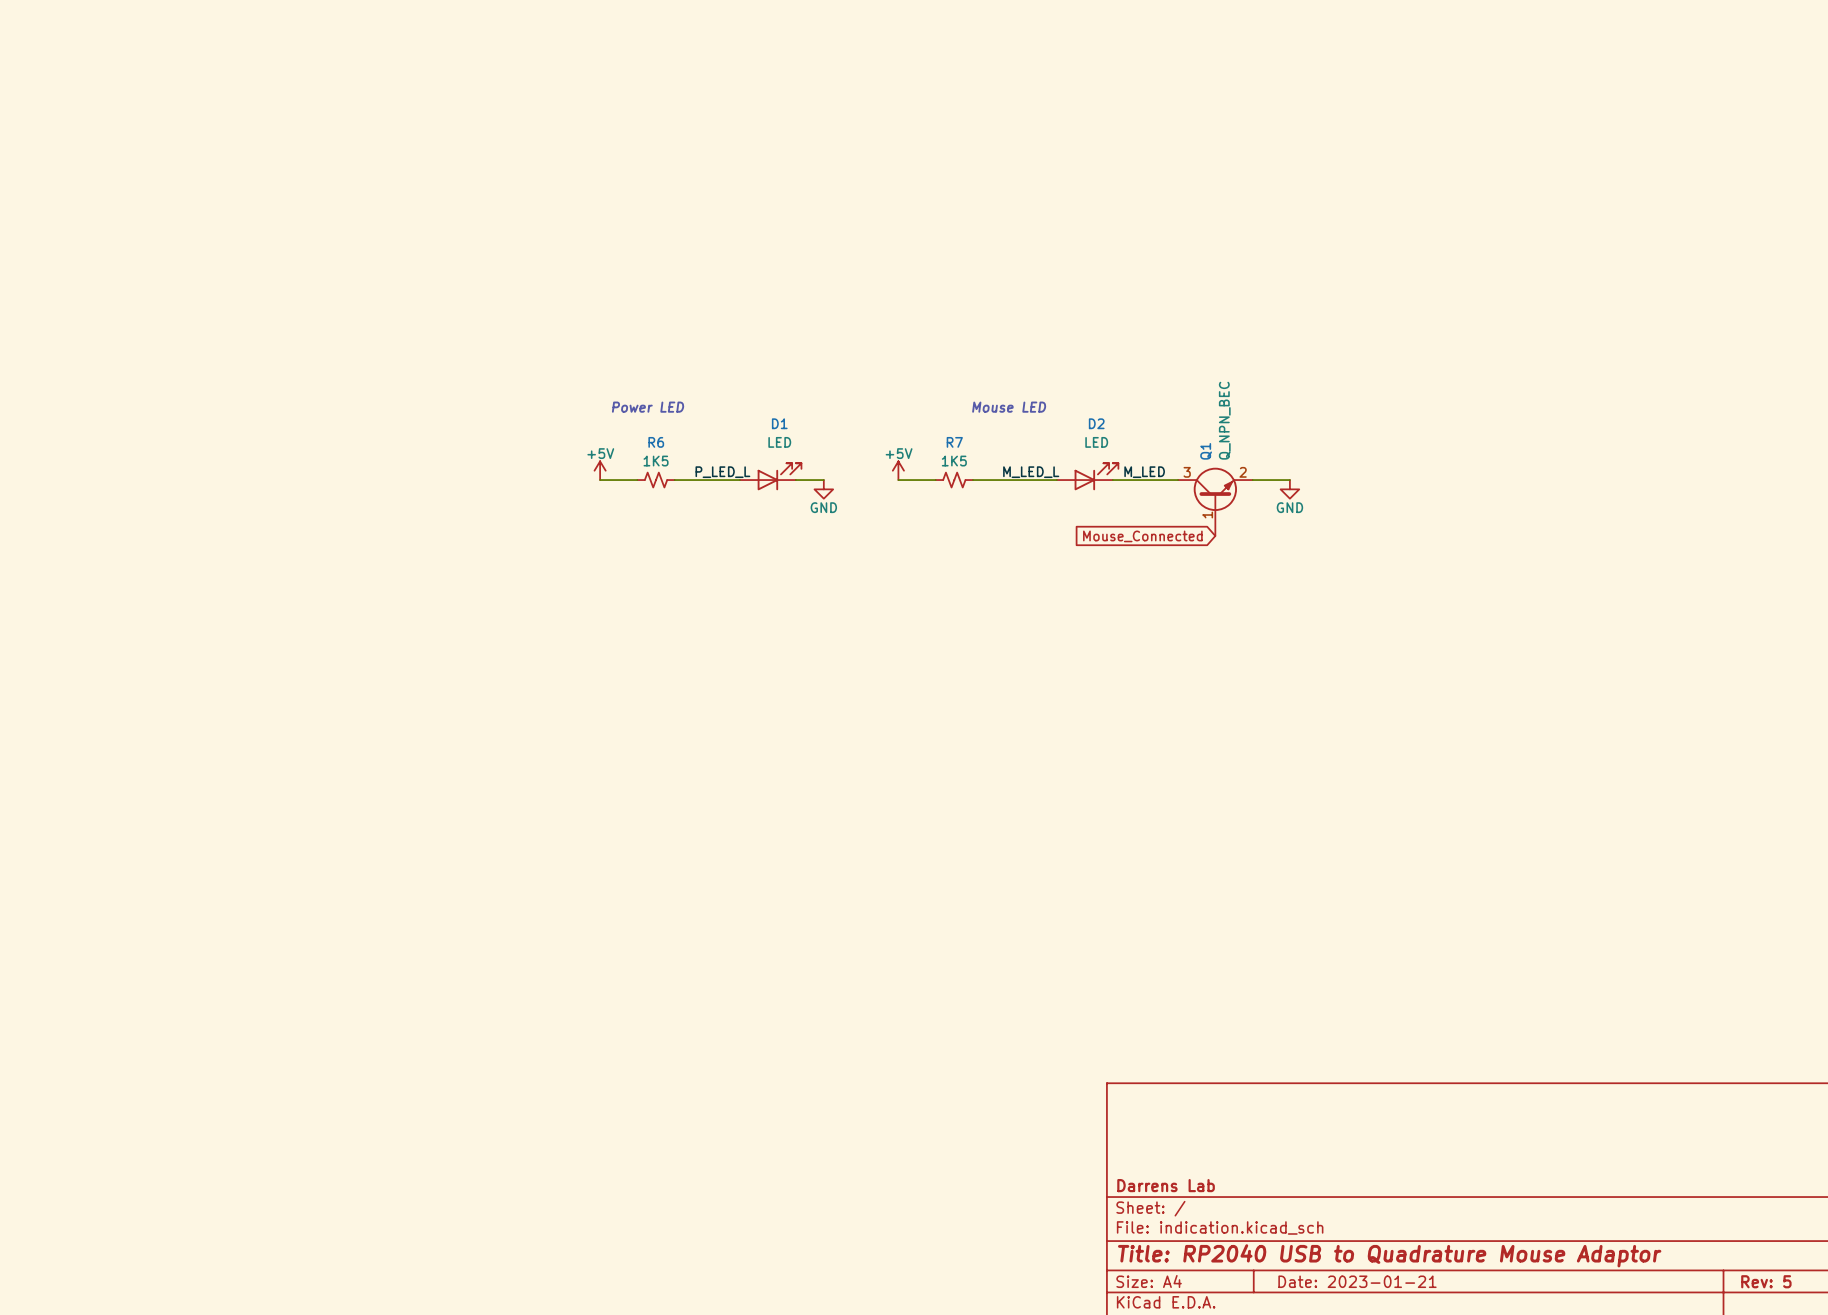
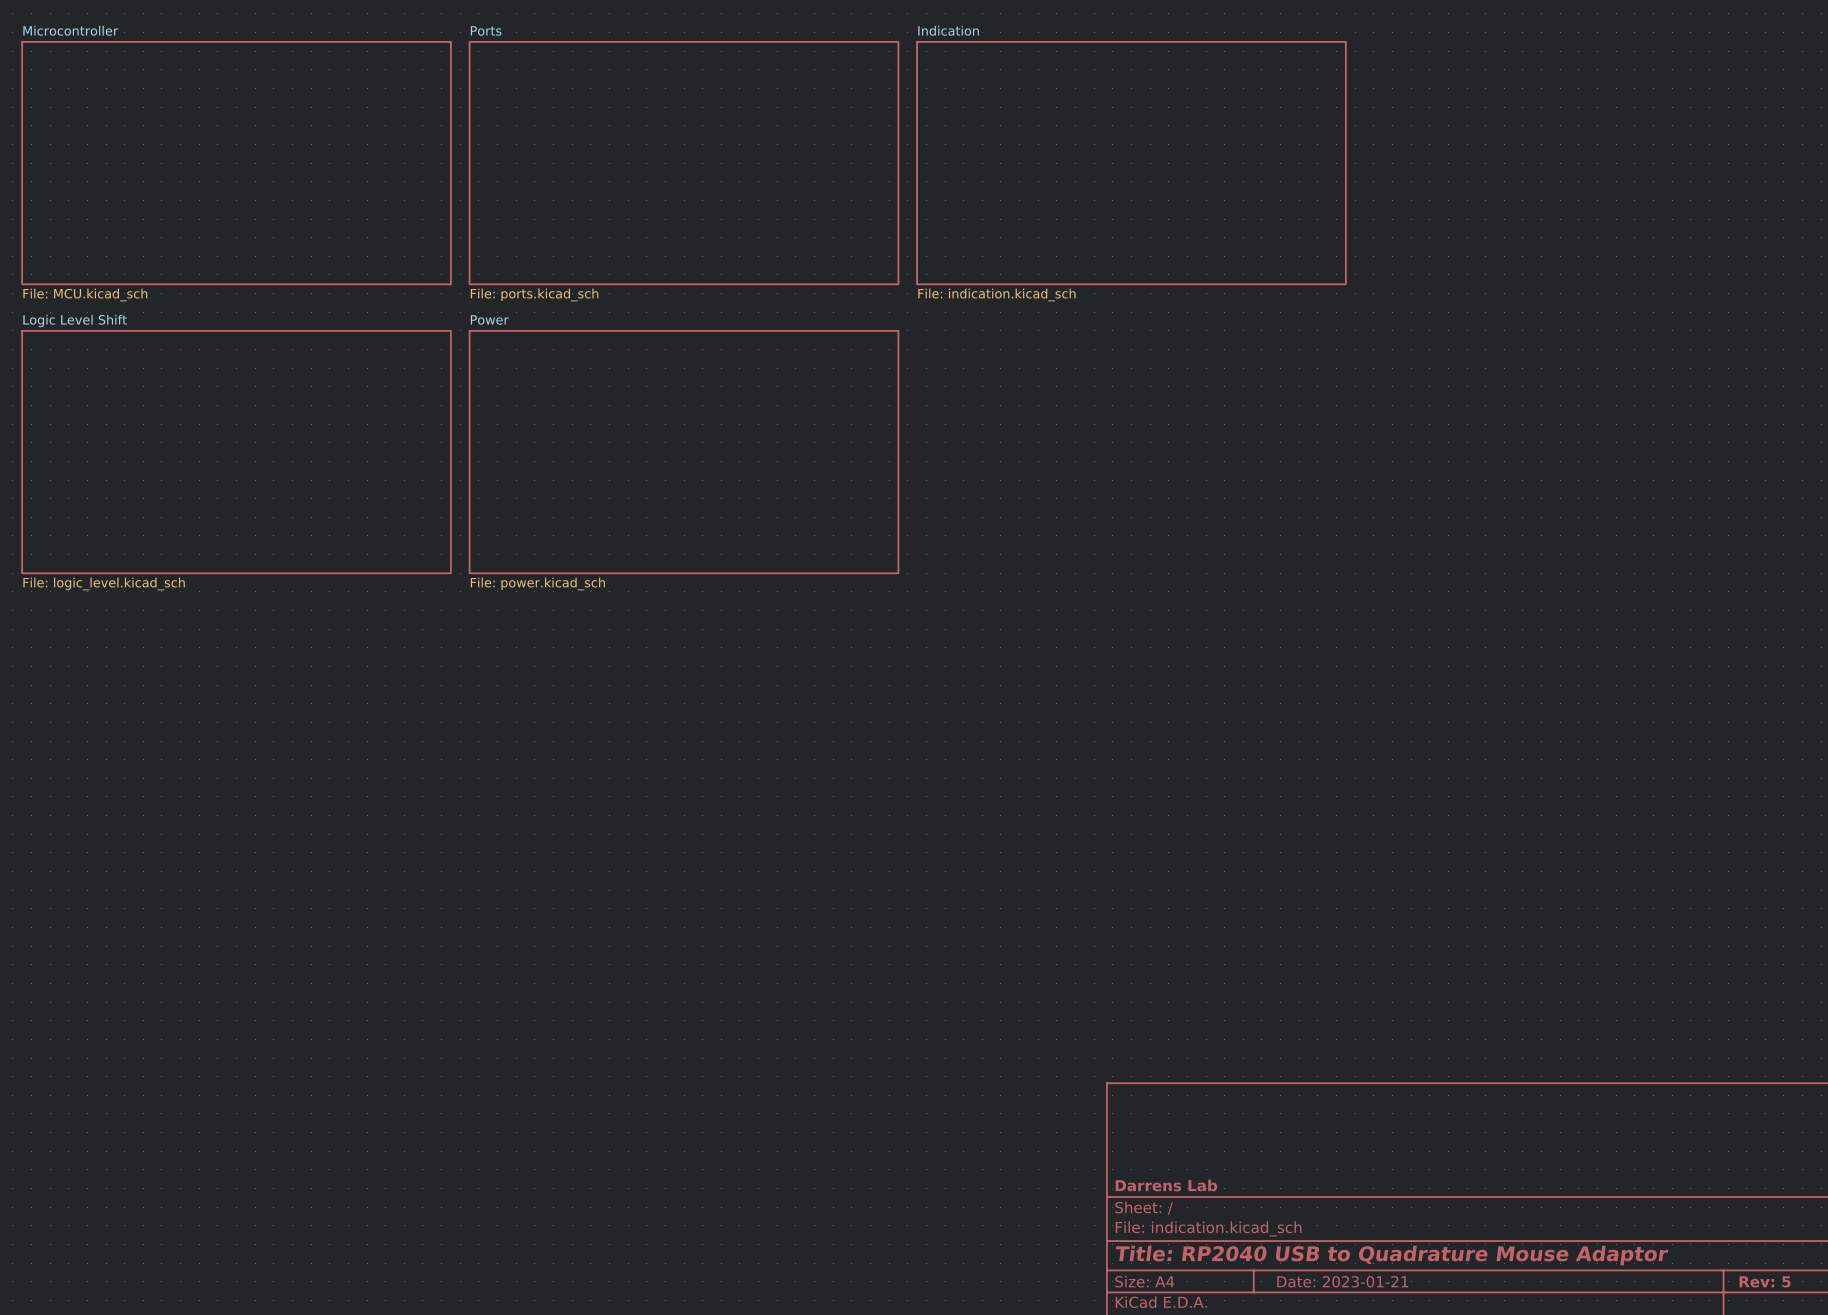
sheet Microcontroller: none -> File: MCU.kicad_sch (236, 163)
sheet Ports: none -> File: ports.kicad_sch (684, 163)
sheet Indication: none -> File: indication.kicad_sch (1131, 163)
text: Power LED (648, 407) -> none
text: Mouse LED (1009, 407) -> none
sheet Logic Level Shift: none -> File: logic_level.kicad_sch (236, 452)
sheet Power: none -> File: power.kicad_sch (684, 452)
power symbol: +5V (600, 470) -> none
power symbol: +5V (898, 470) -> none
label: P_LED_L (722, 472) -> none
label: M_LED_L (1031, 472) -> none
label: M_LED (1144, 472) -> none
D1: LED (770, 476) -> none
D2: LED (1087, 476) -> none
wire: (600, 480) (637, 480) -> none
R6: 1K5 (656, 480) -> none
wire: (674, 480) (739, 480) -> none
wire: (795, 480) (823, 480) -> none
wire: (898, 480) (935, 480) -> none
R7: 1K5 (954, 480) -> none
wire: (972, 480) (1056, 480) -> none
wire: (1112, 480) (1178, 480) -> none
wire: (1252, 480) (1289, 480) -> none
power symbol: GND (823, 489) -> none
power symbol: GND (1289, 489) -> none
Q1: Q_NPN_BEC (1215, 501) -> none
global label: Mouse_Connected (1142, 536) -> none

